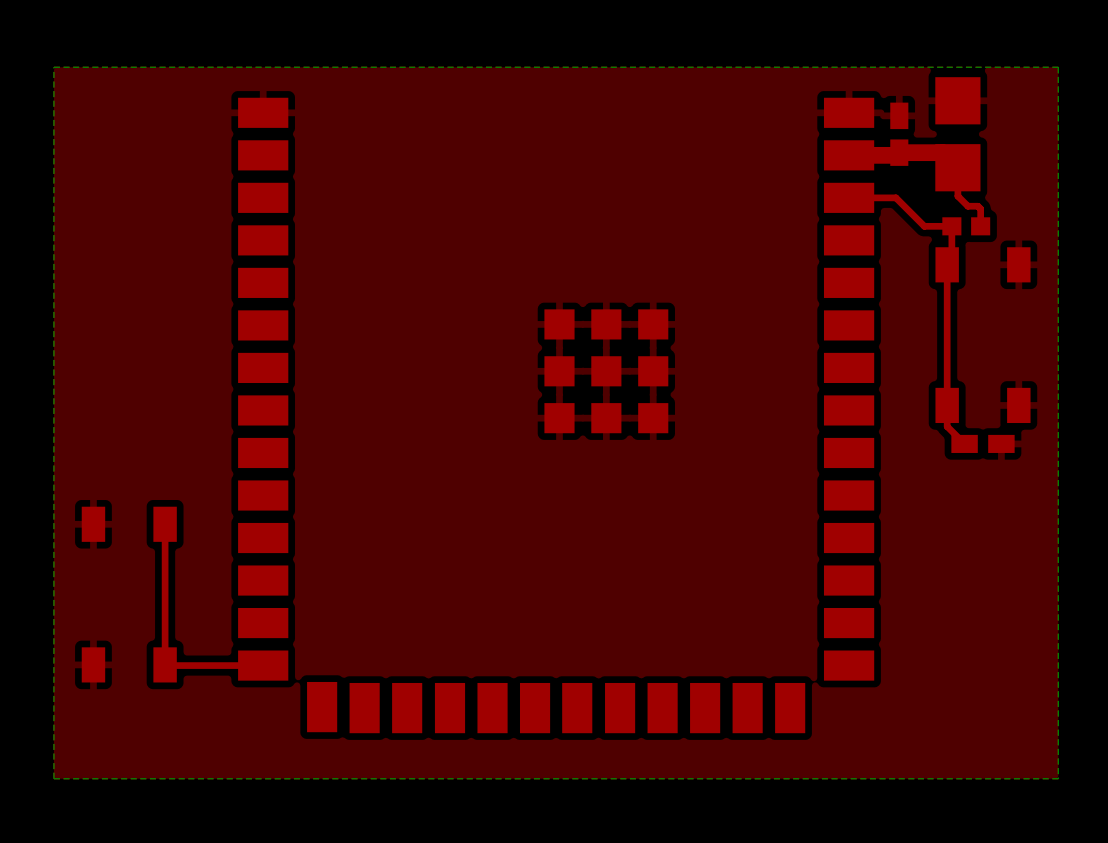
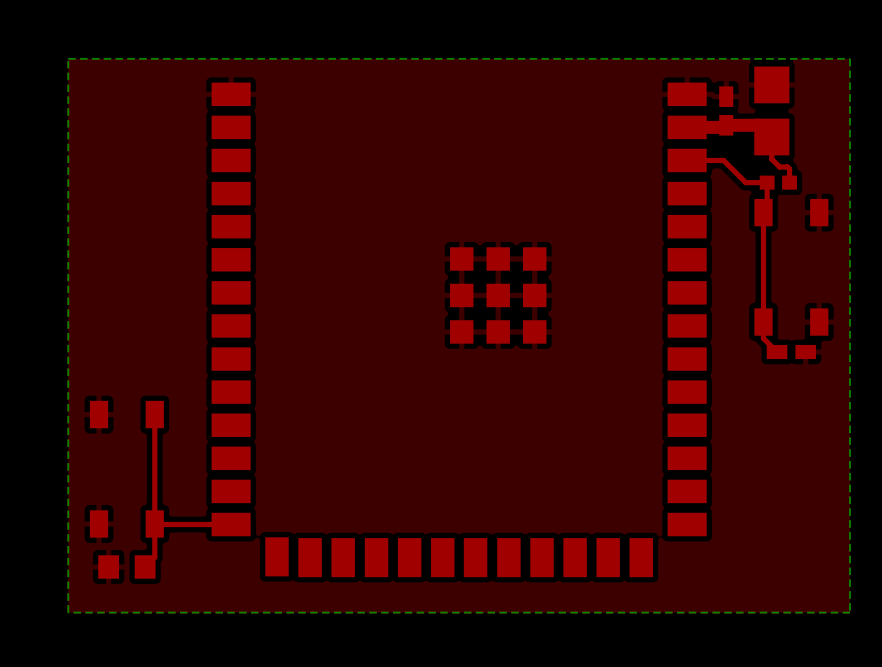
top track: none -> (154, 523) (154, 557) (145, 566)
part: none -> (126, 566)

